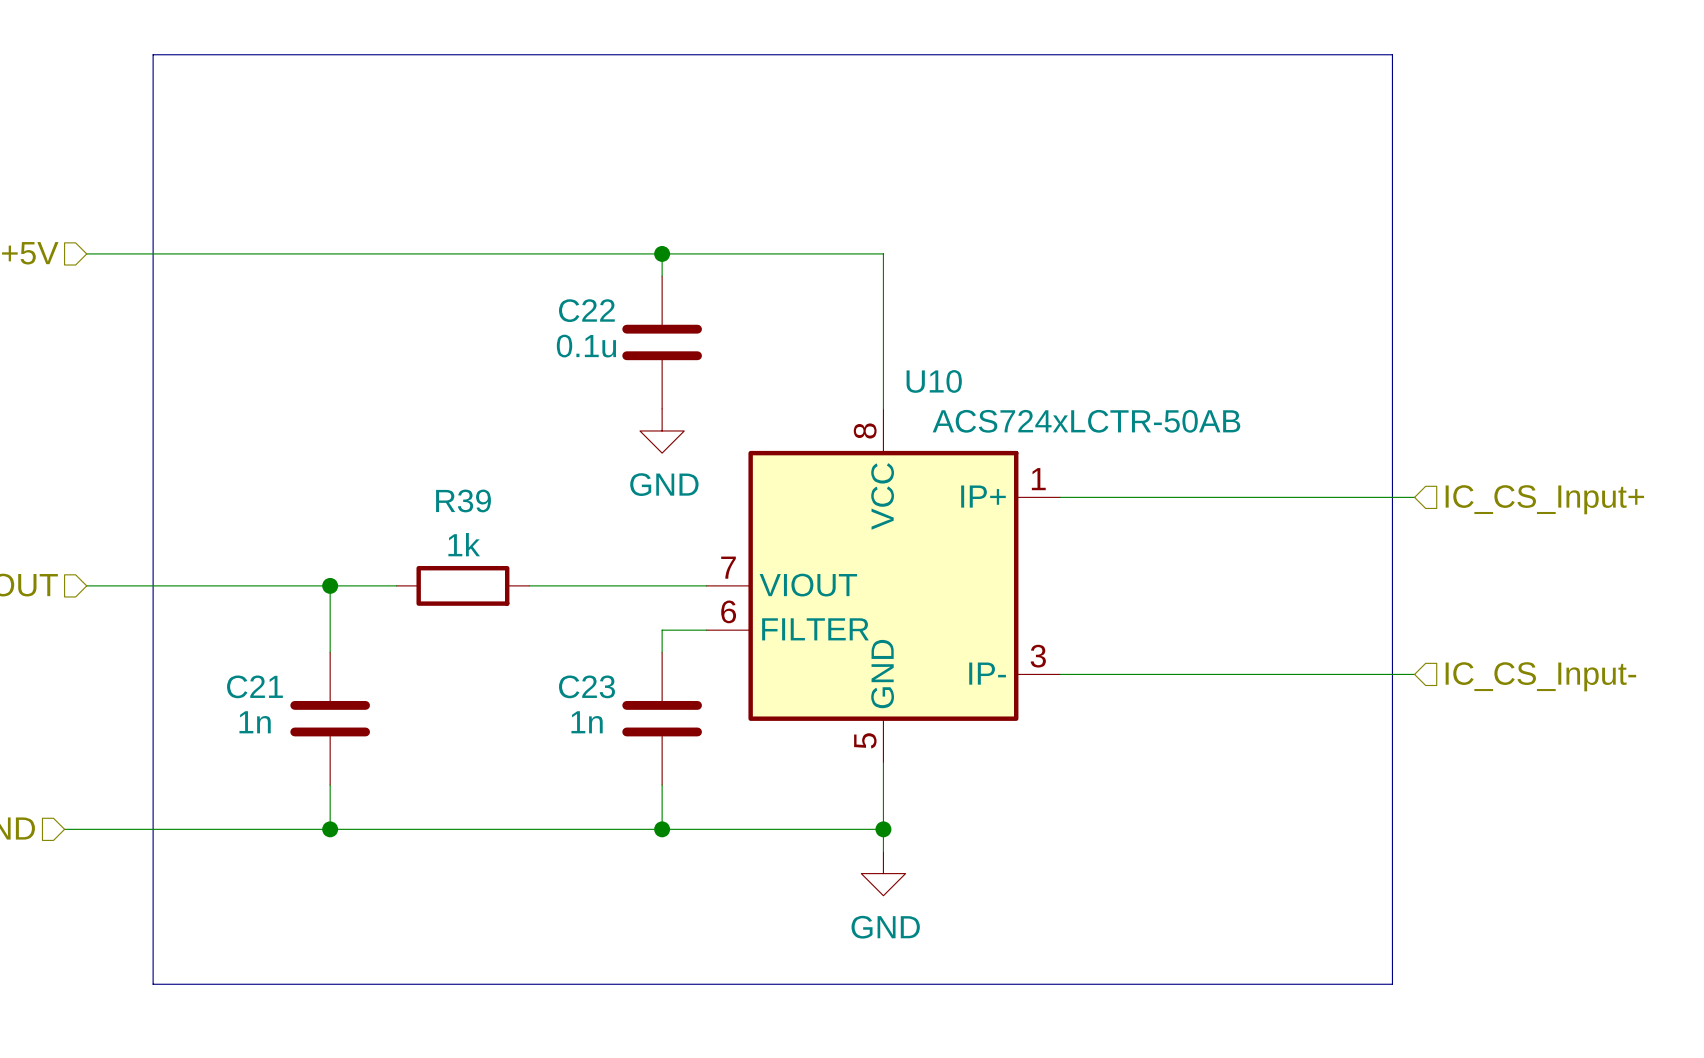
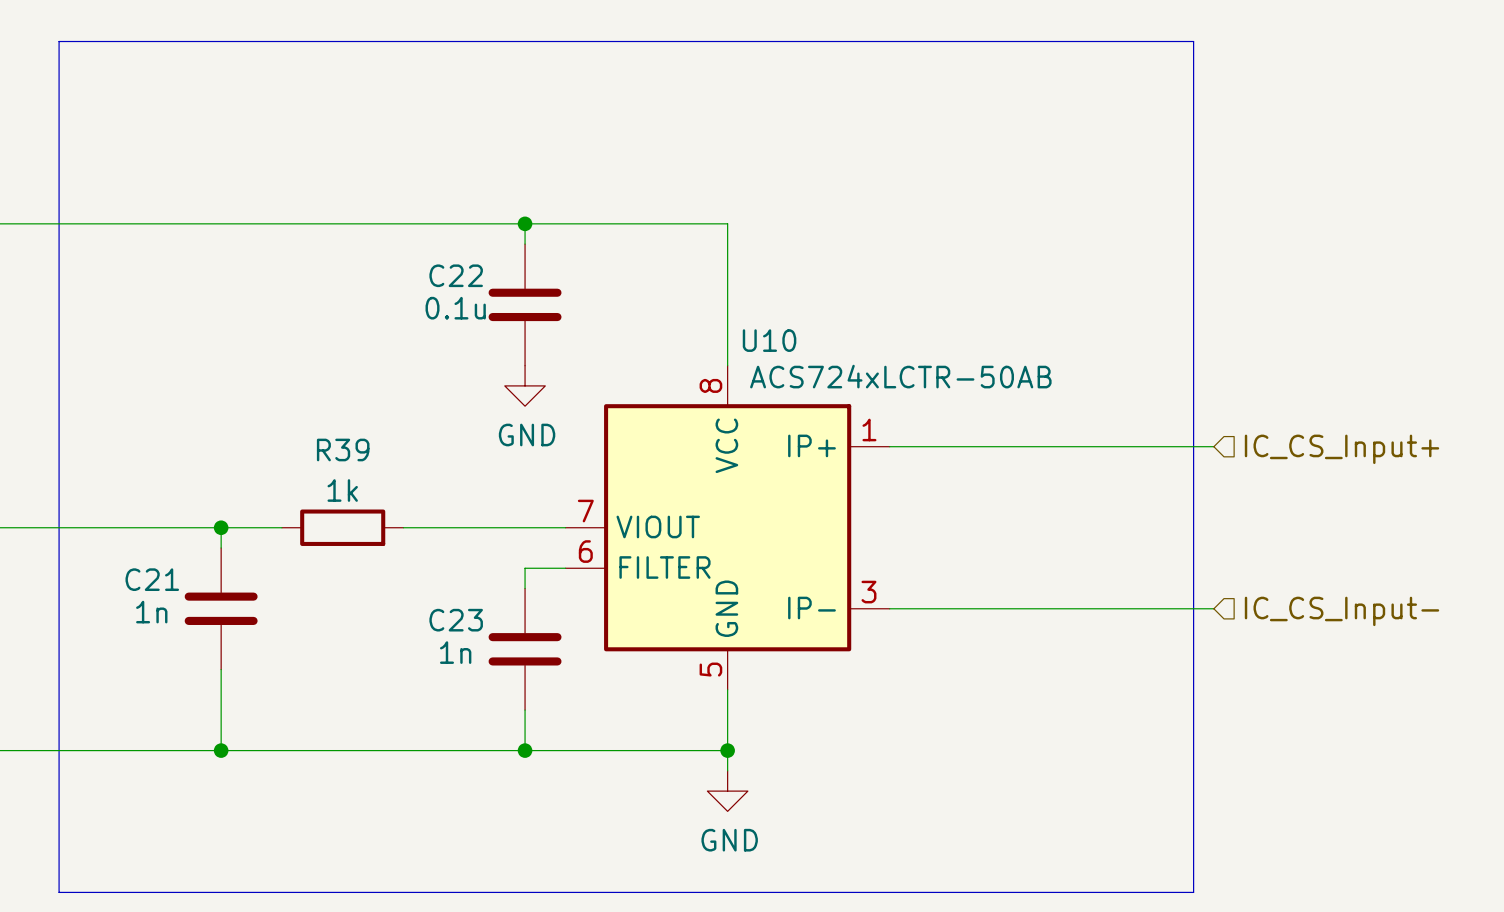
C21 position: (330, 718) -> (221, 608)

